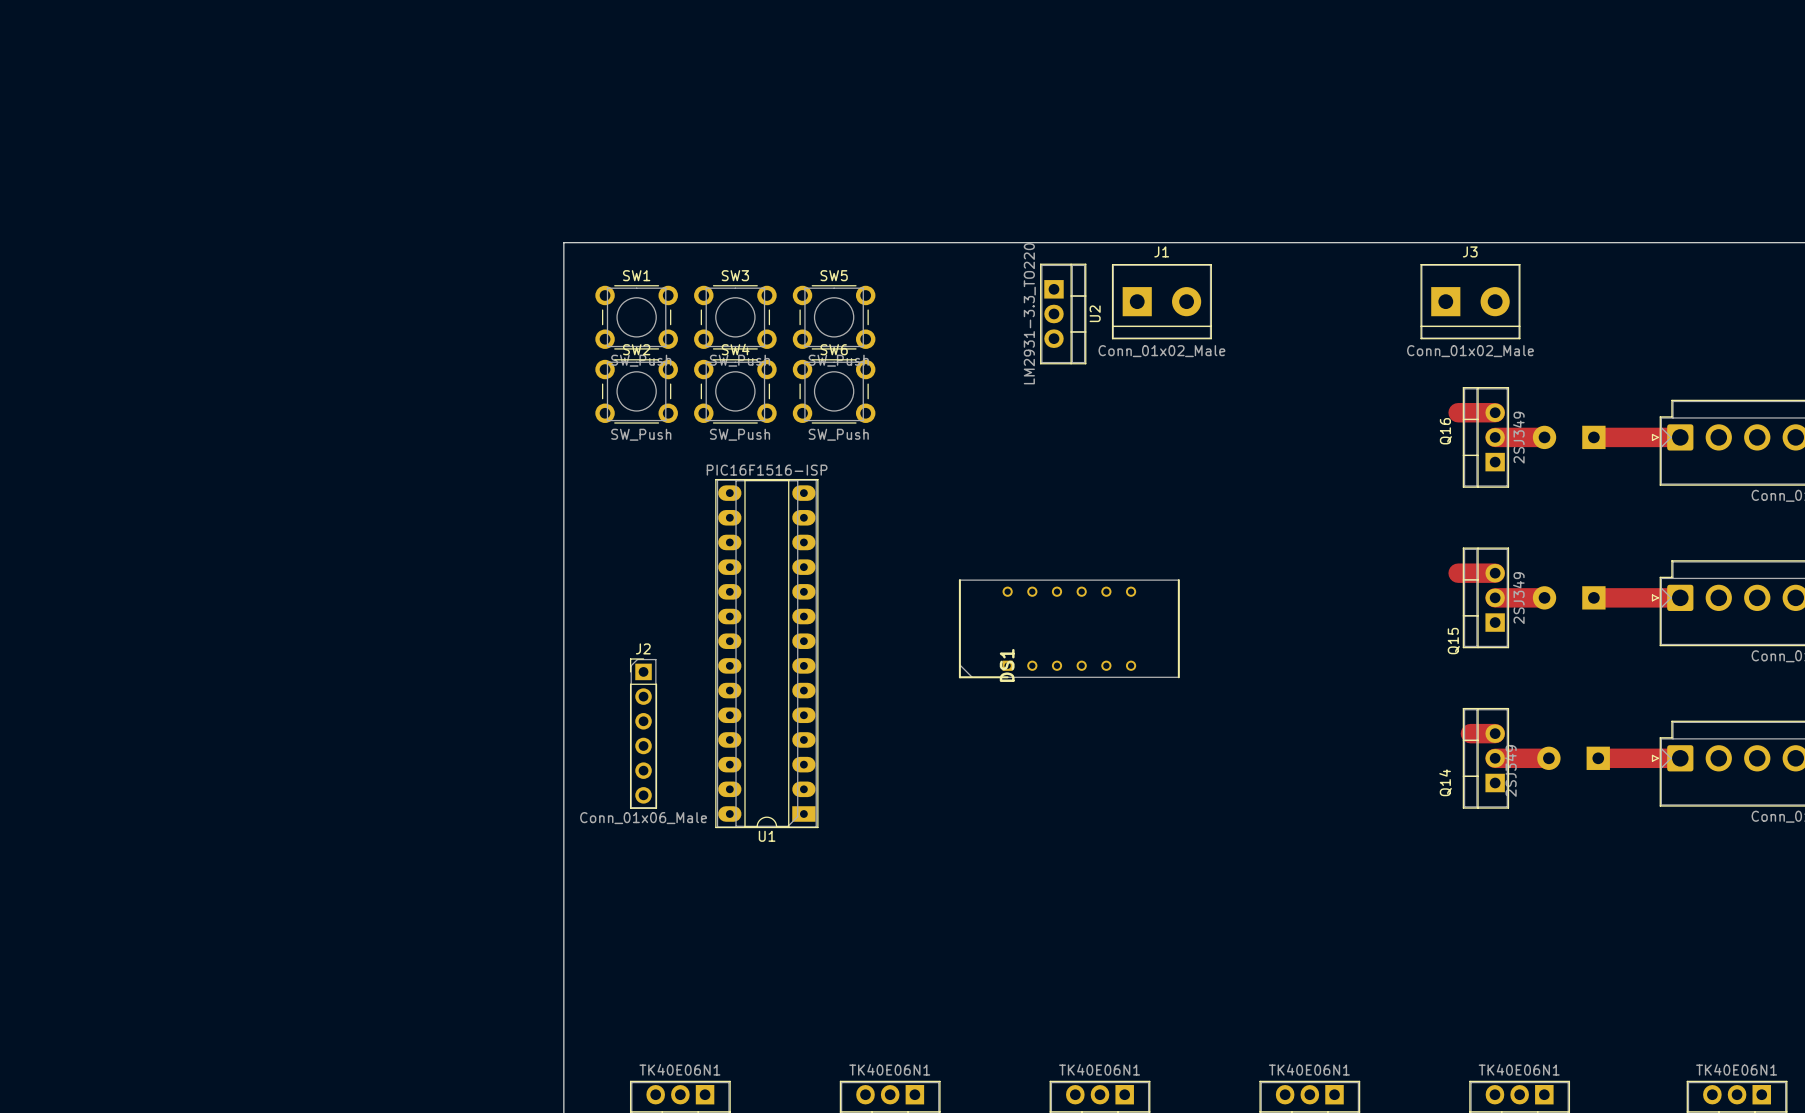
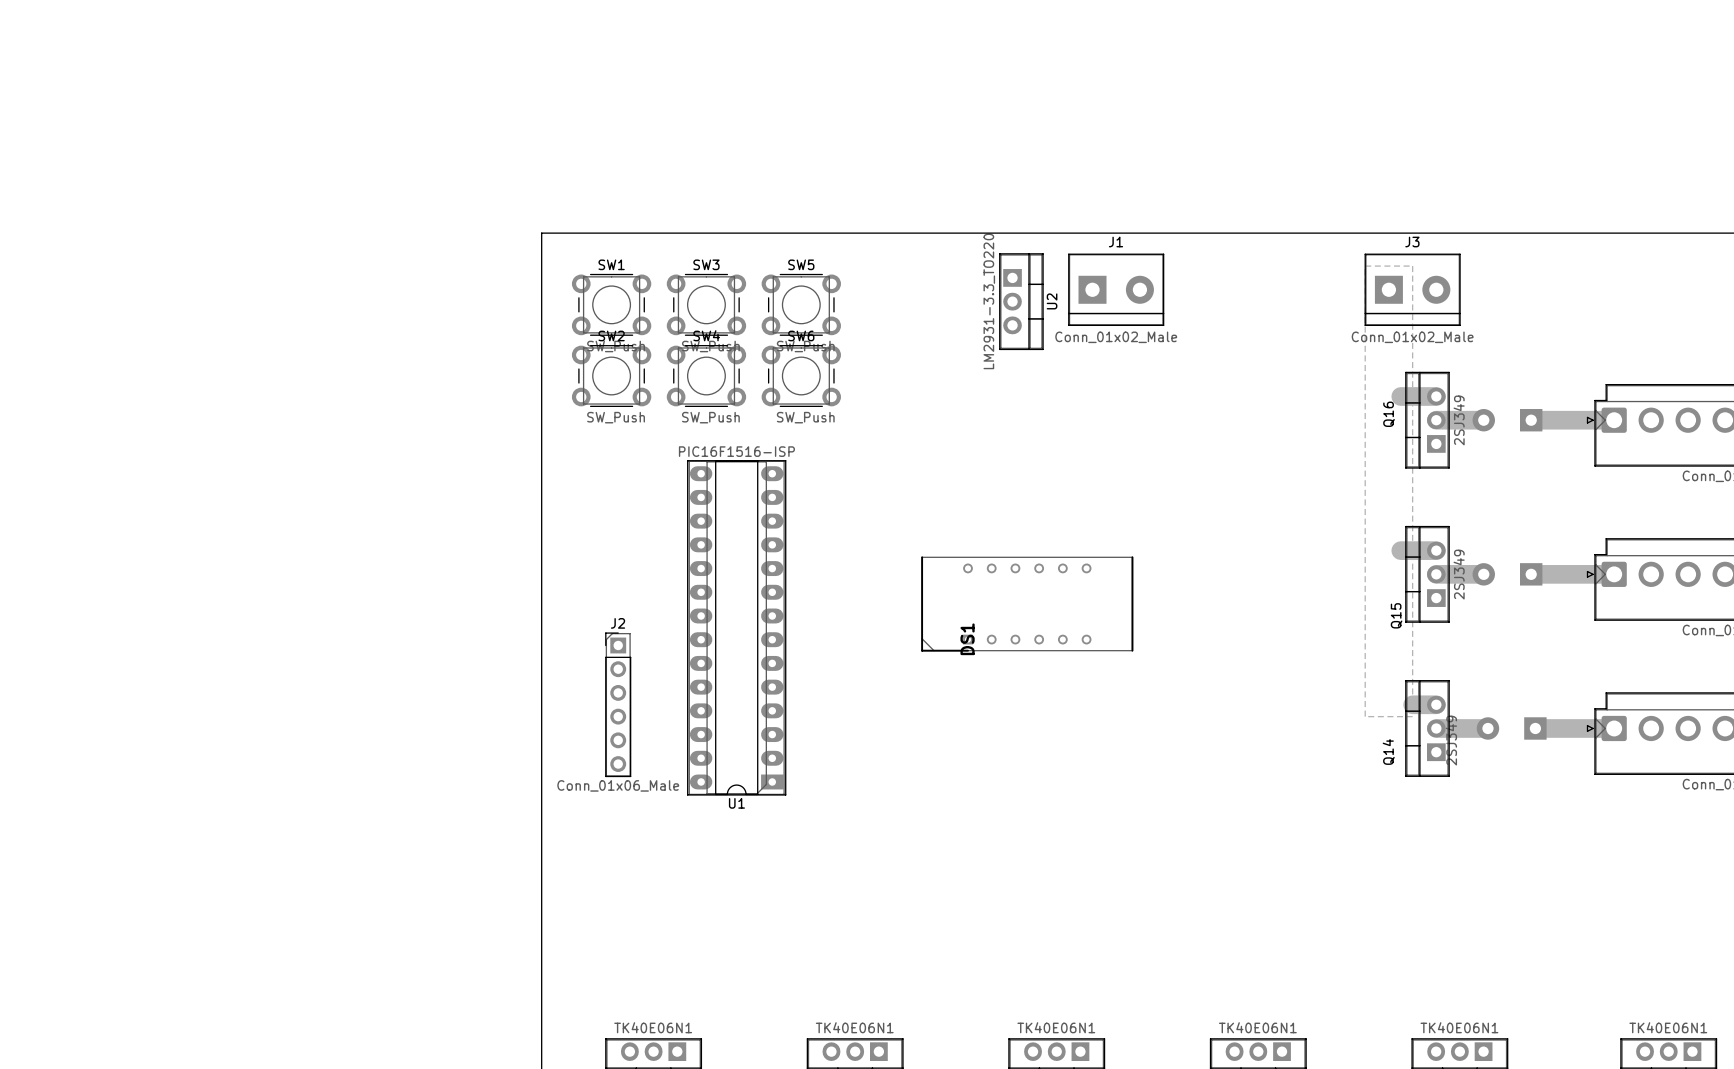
zone outline: none -> (1365, 266) (1365, 716) (1412, 716) (1412, 266) (1365, 266)

